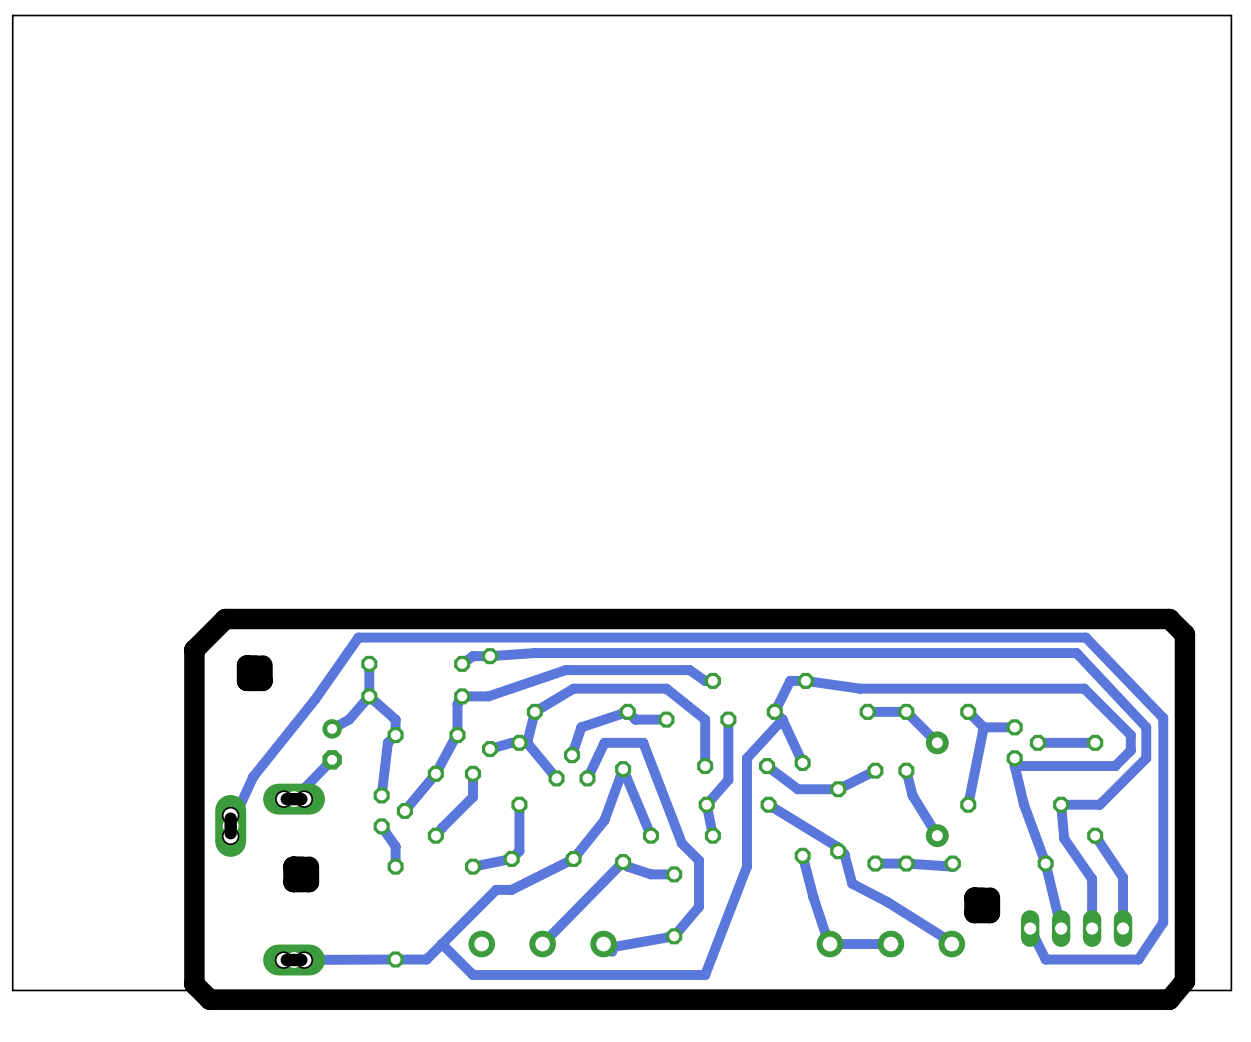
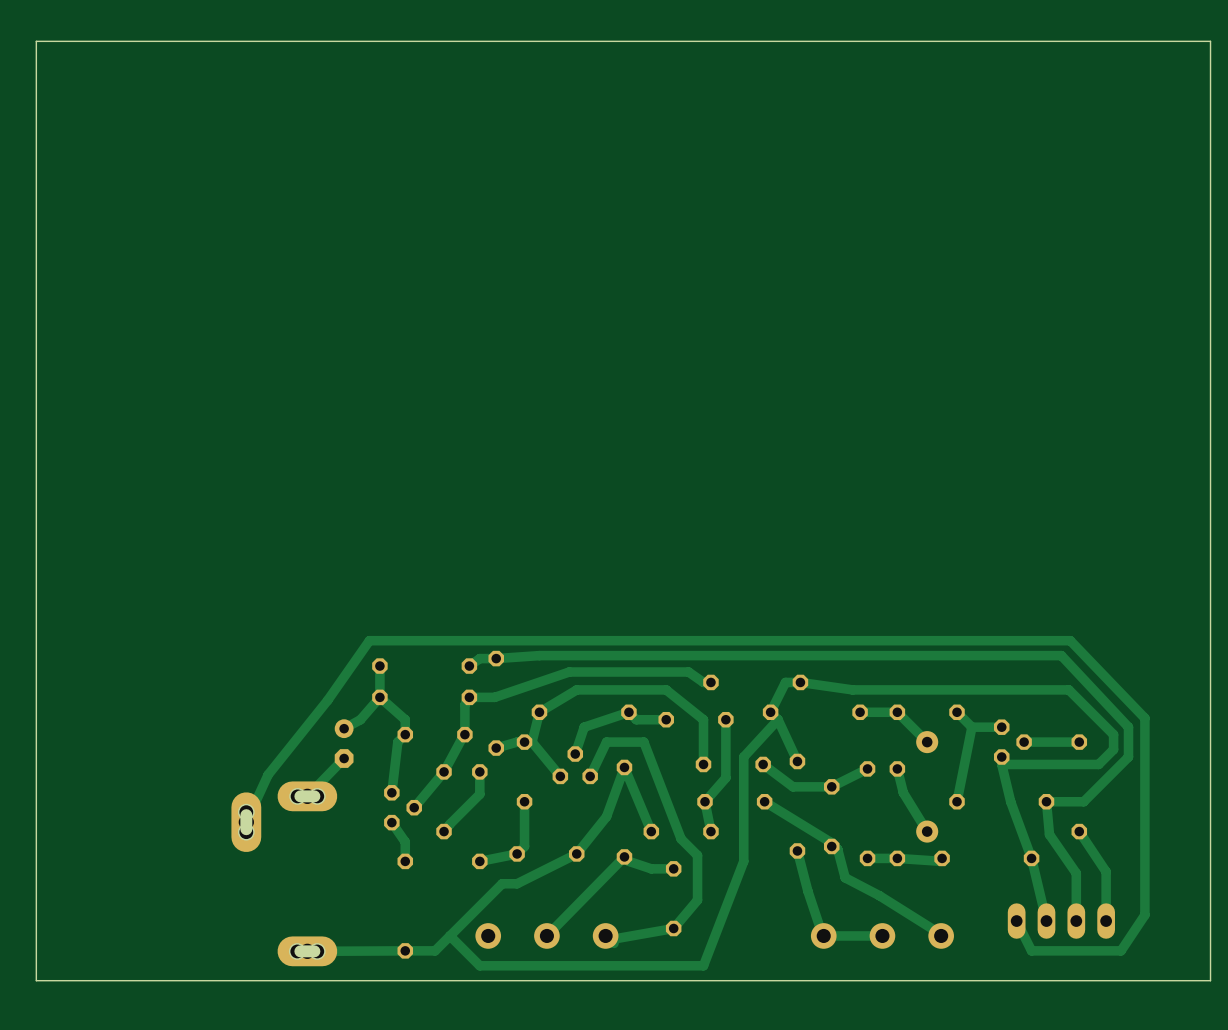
board edge: (1169, 619) (225, 619) (194, 649) (194, 984) (209, 999) (1169, 999) (1184, 981) (1184, 634) (1169, 619) -> none
board edge: (262, 665) (262, 680) (247, 680) (247, 665) (256, 665) -> none
board edge: (308, 866) (308, 882) (293, 882) (293, 866) (302, 866) -> none
board edge: (989, 897) (989, 913) (974, 913) (974, 897) (983, 897) -> none

